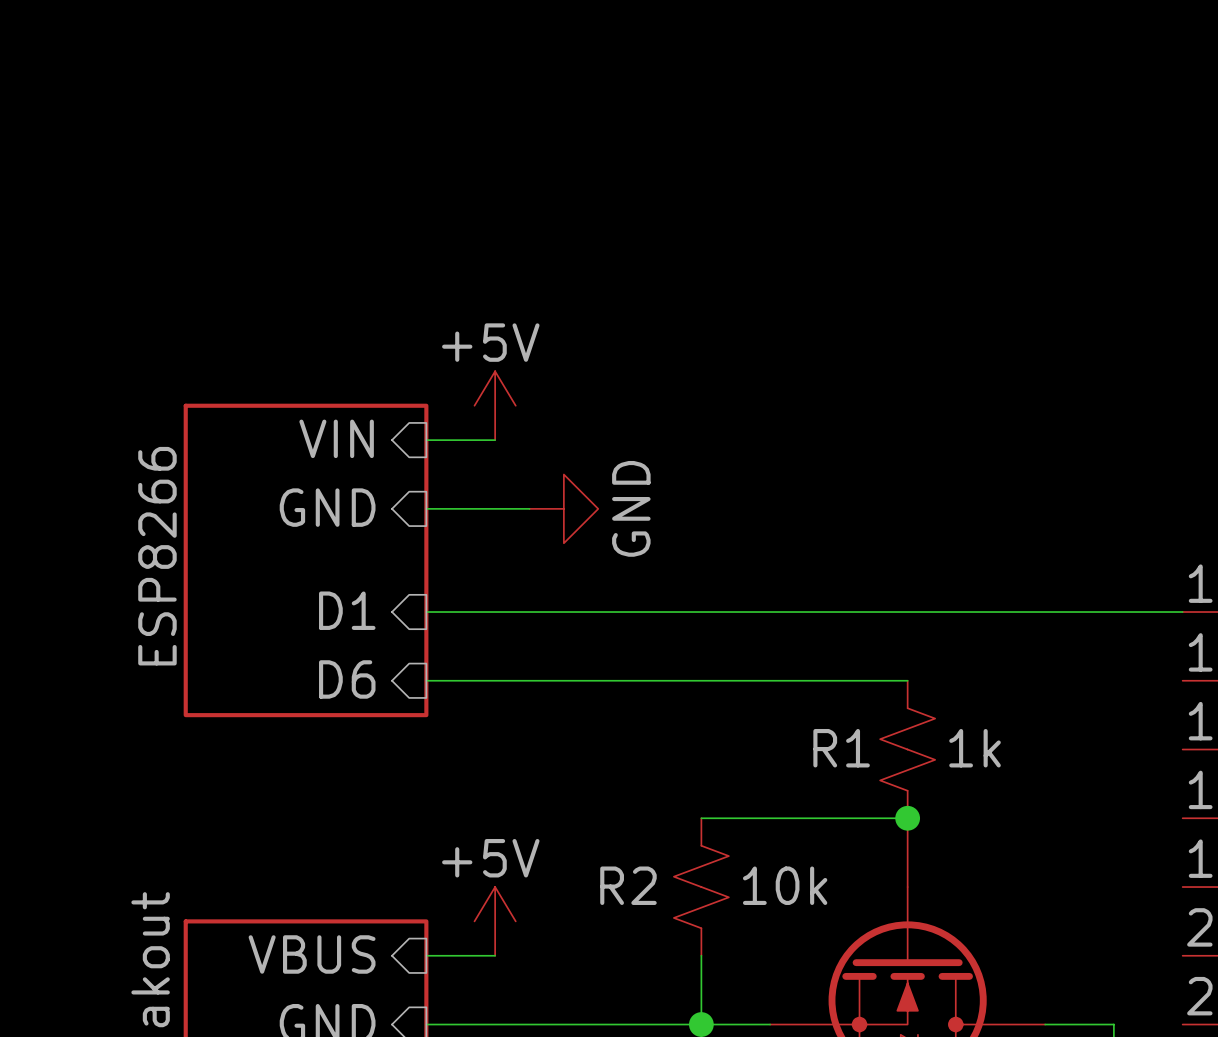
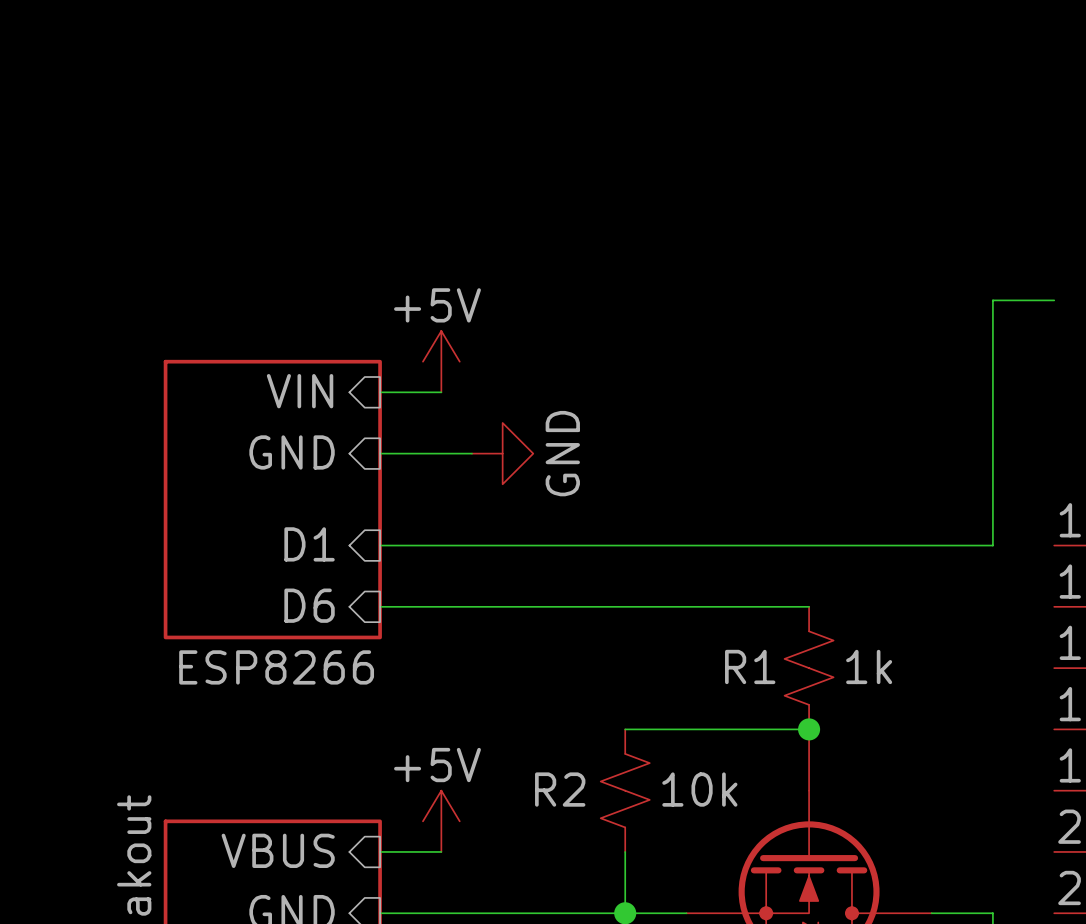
sheet ESP8266 name rotation: 0° (157, 556) -> 90° clockwise (276, 667)
wire: (1113, 612) (1182, 612) -> (992, 545) (992, 300) (1054, 300)

